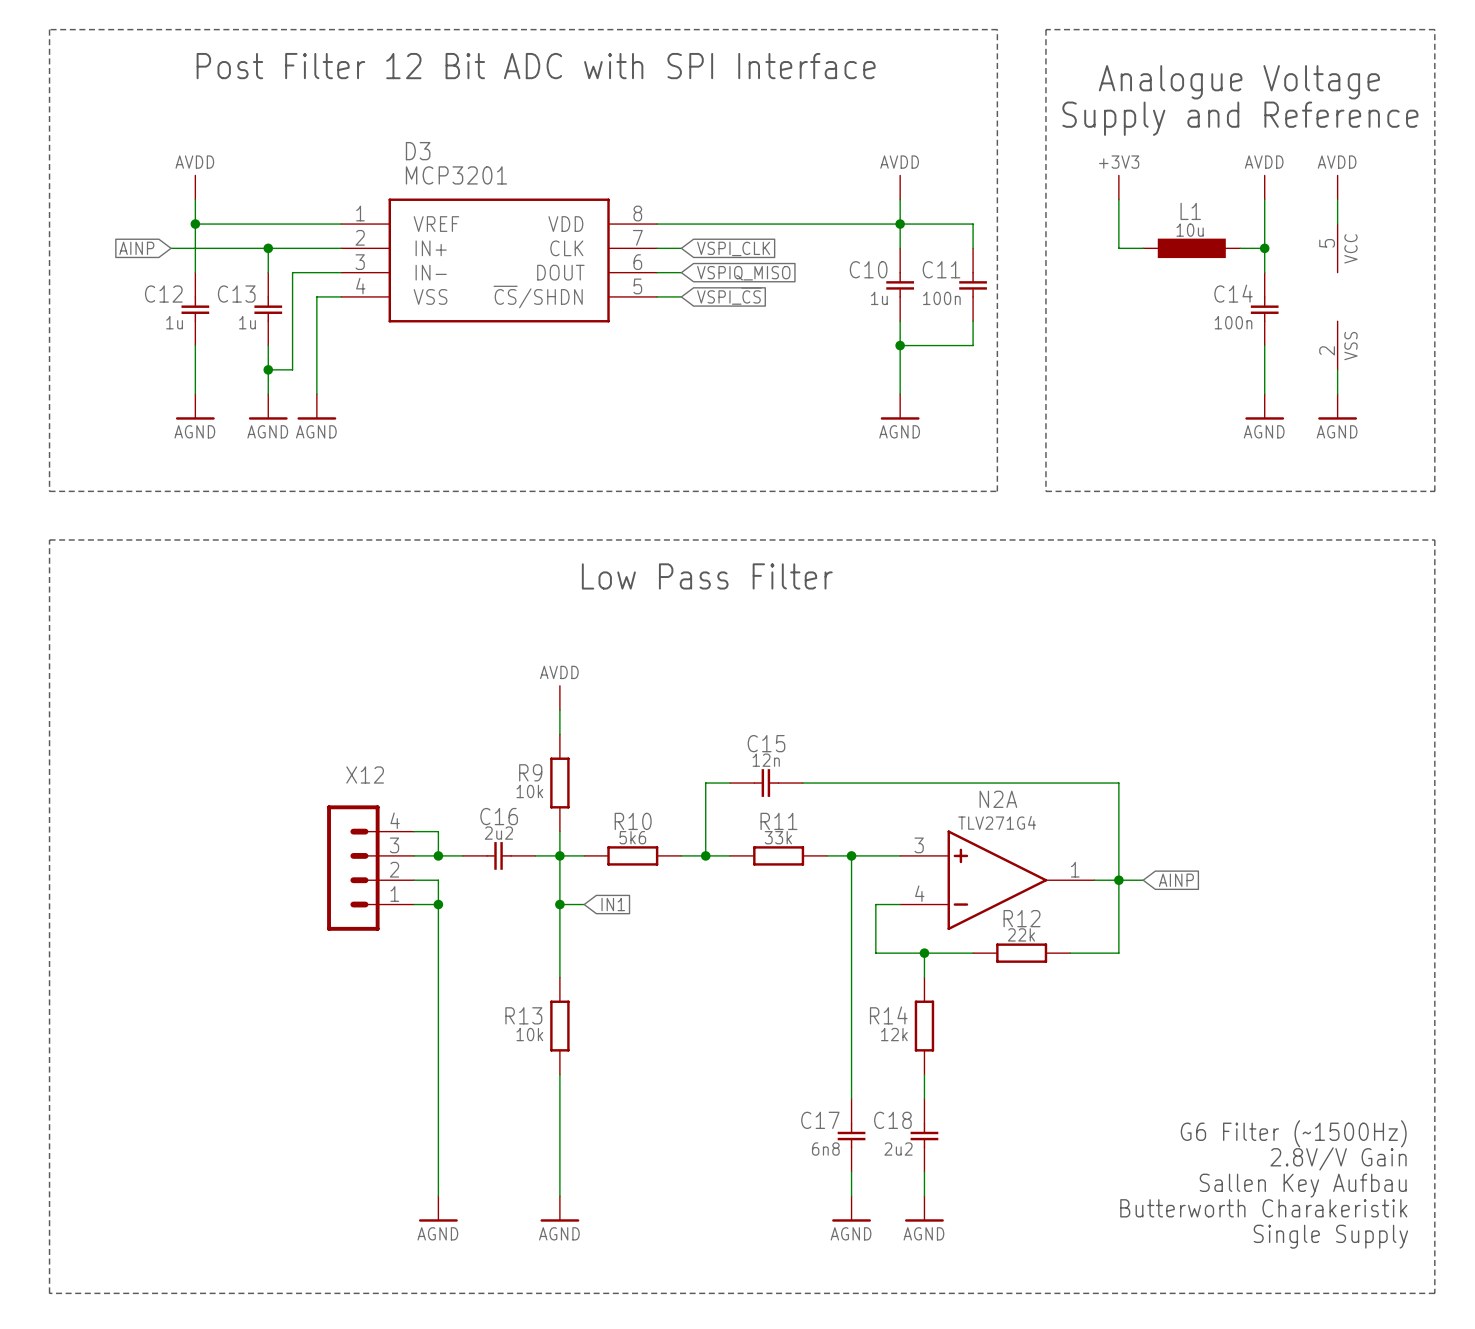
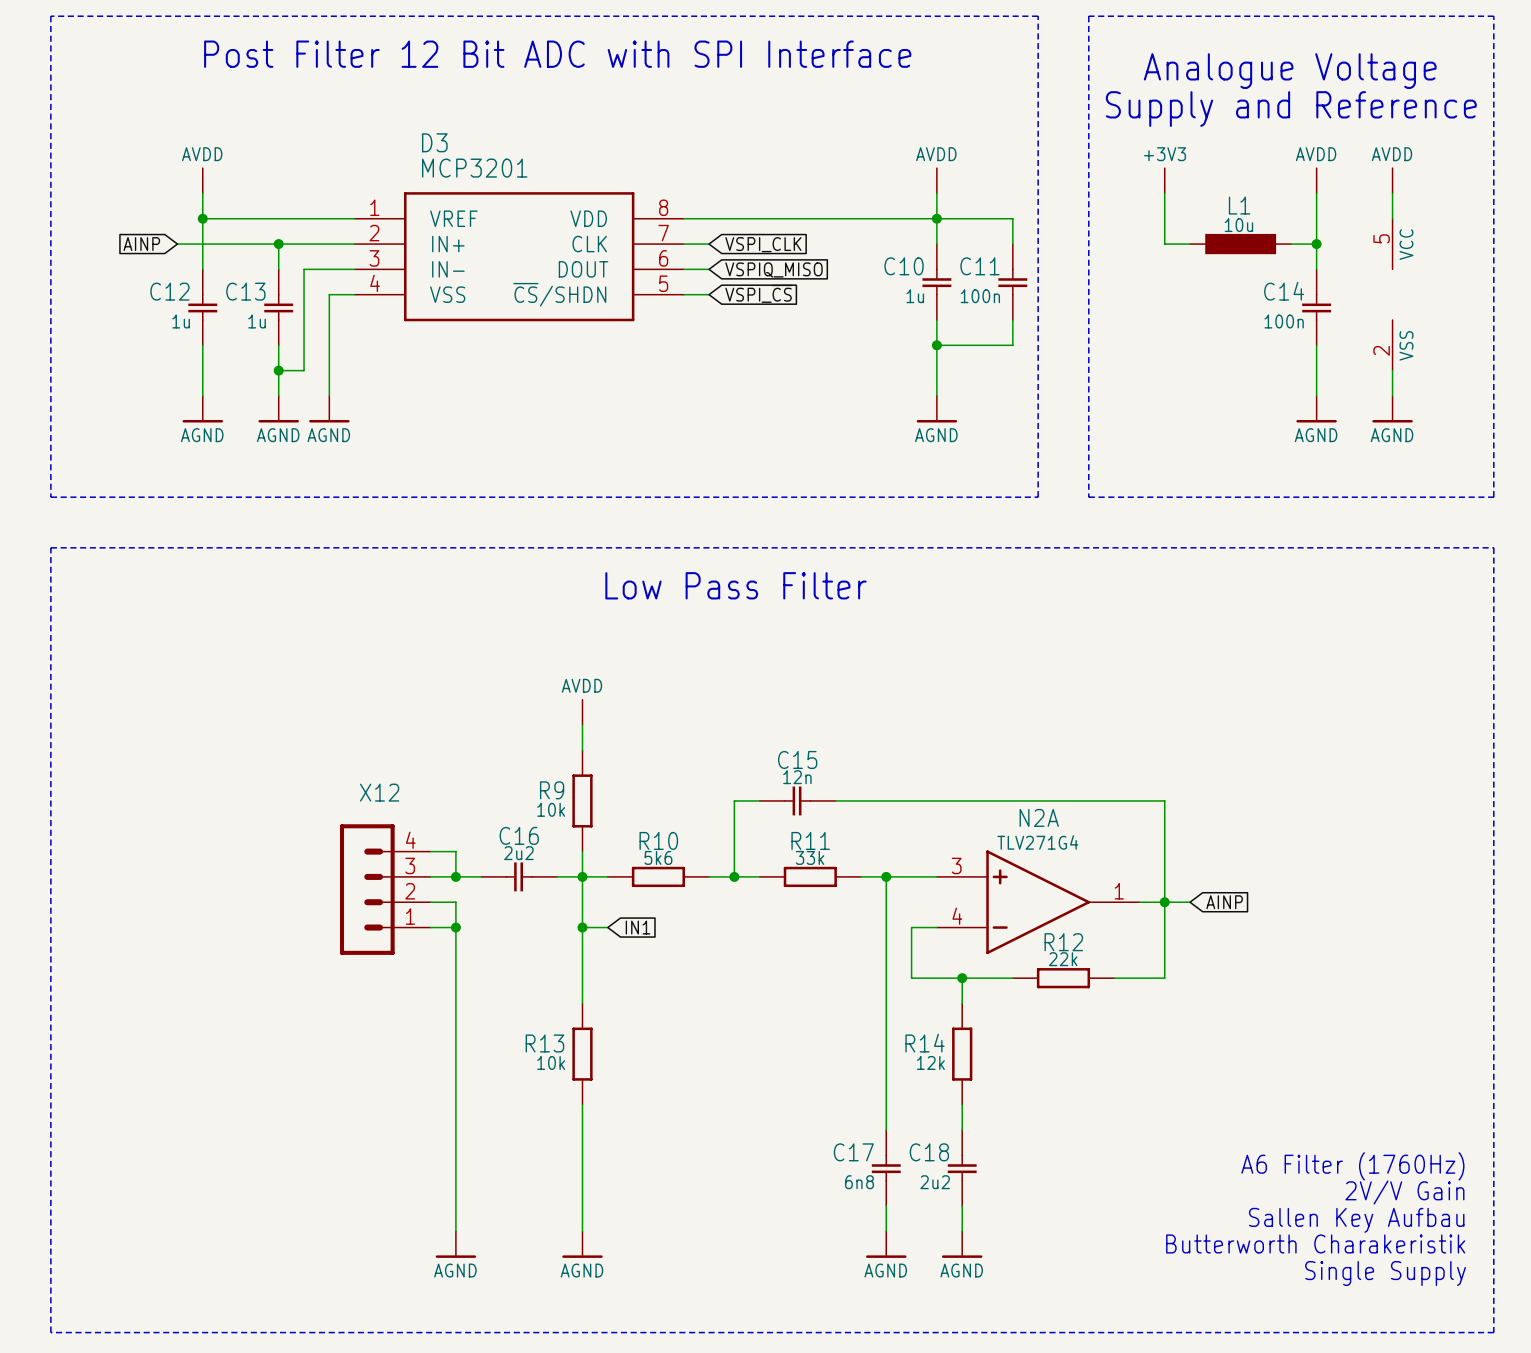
text: G6 Filter (~1500Hz) (1293, 1133) -> A6 Filter (1760Hz) (1352, 1166)
text: 2.8V/V Gain (1338, 1158) -> 2V/V Gain (1404, 1192)

